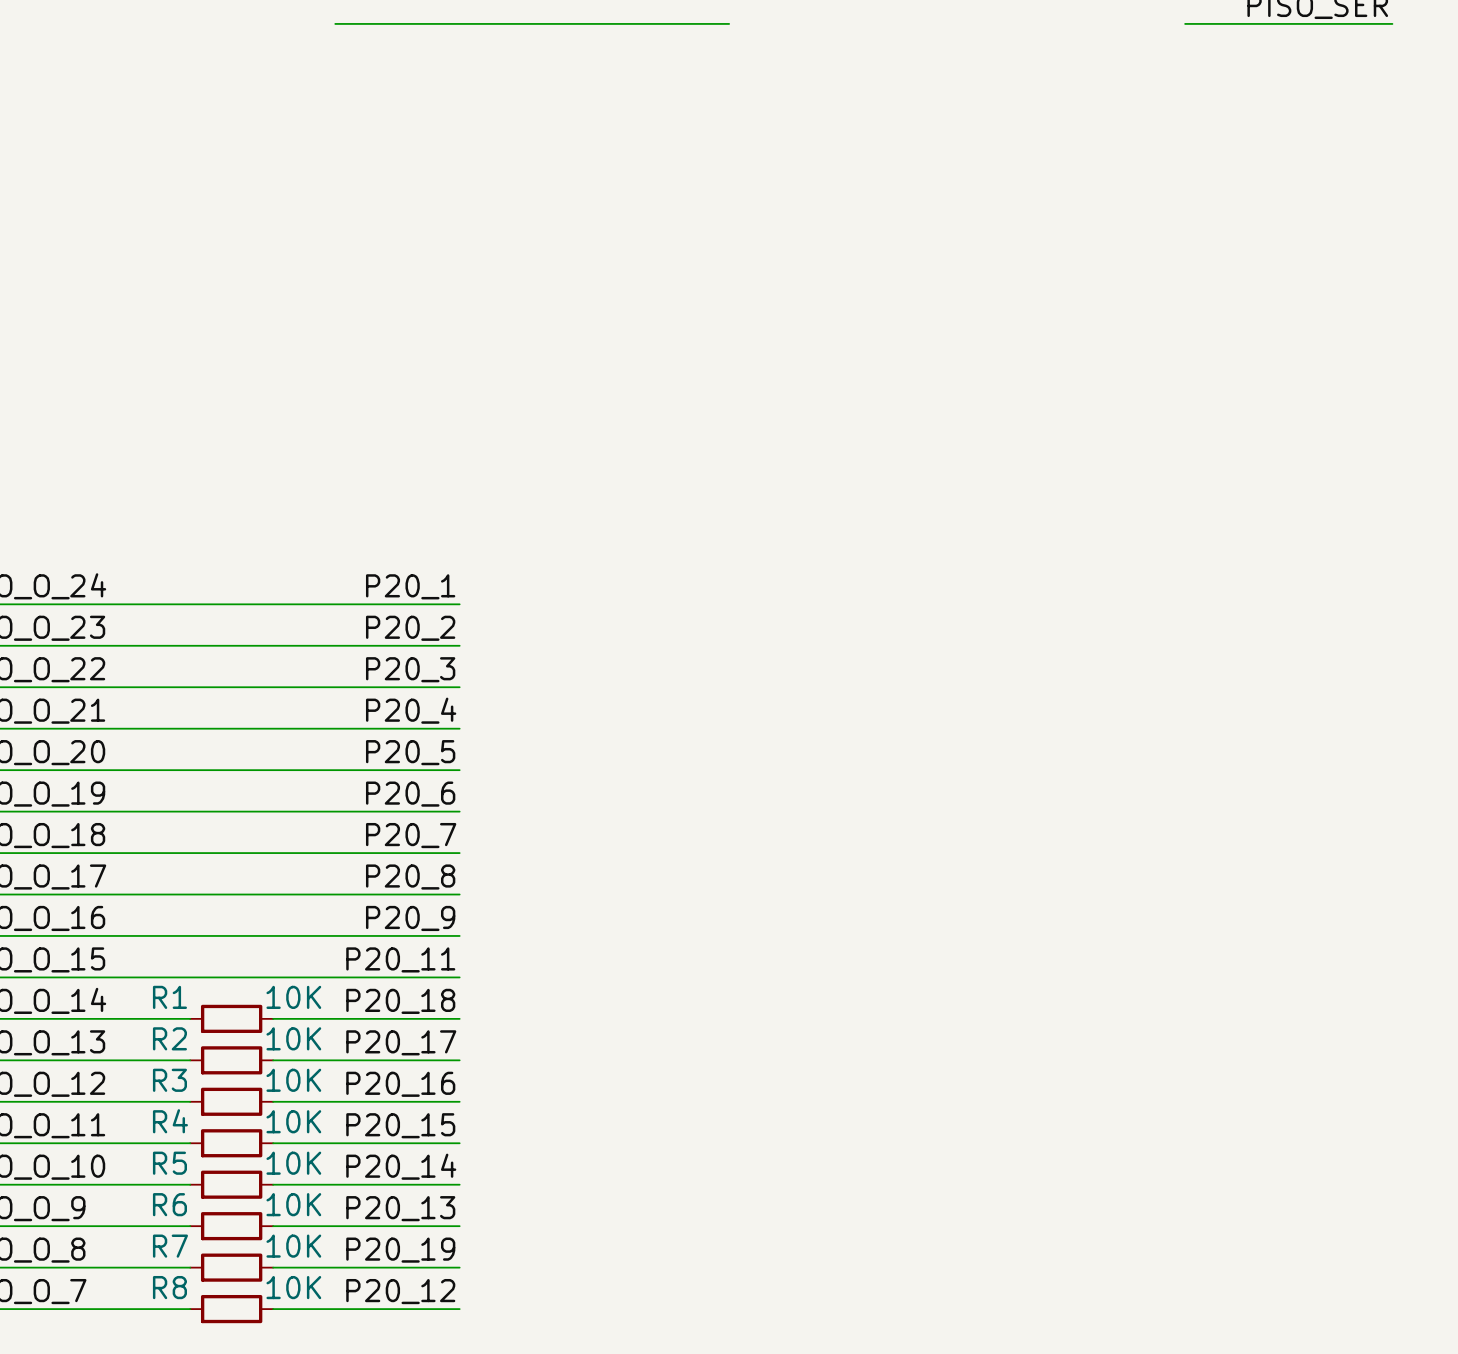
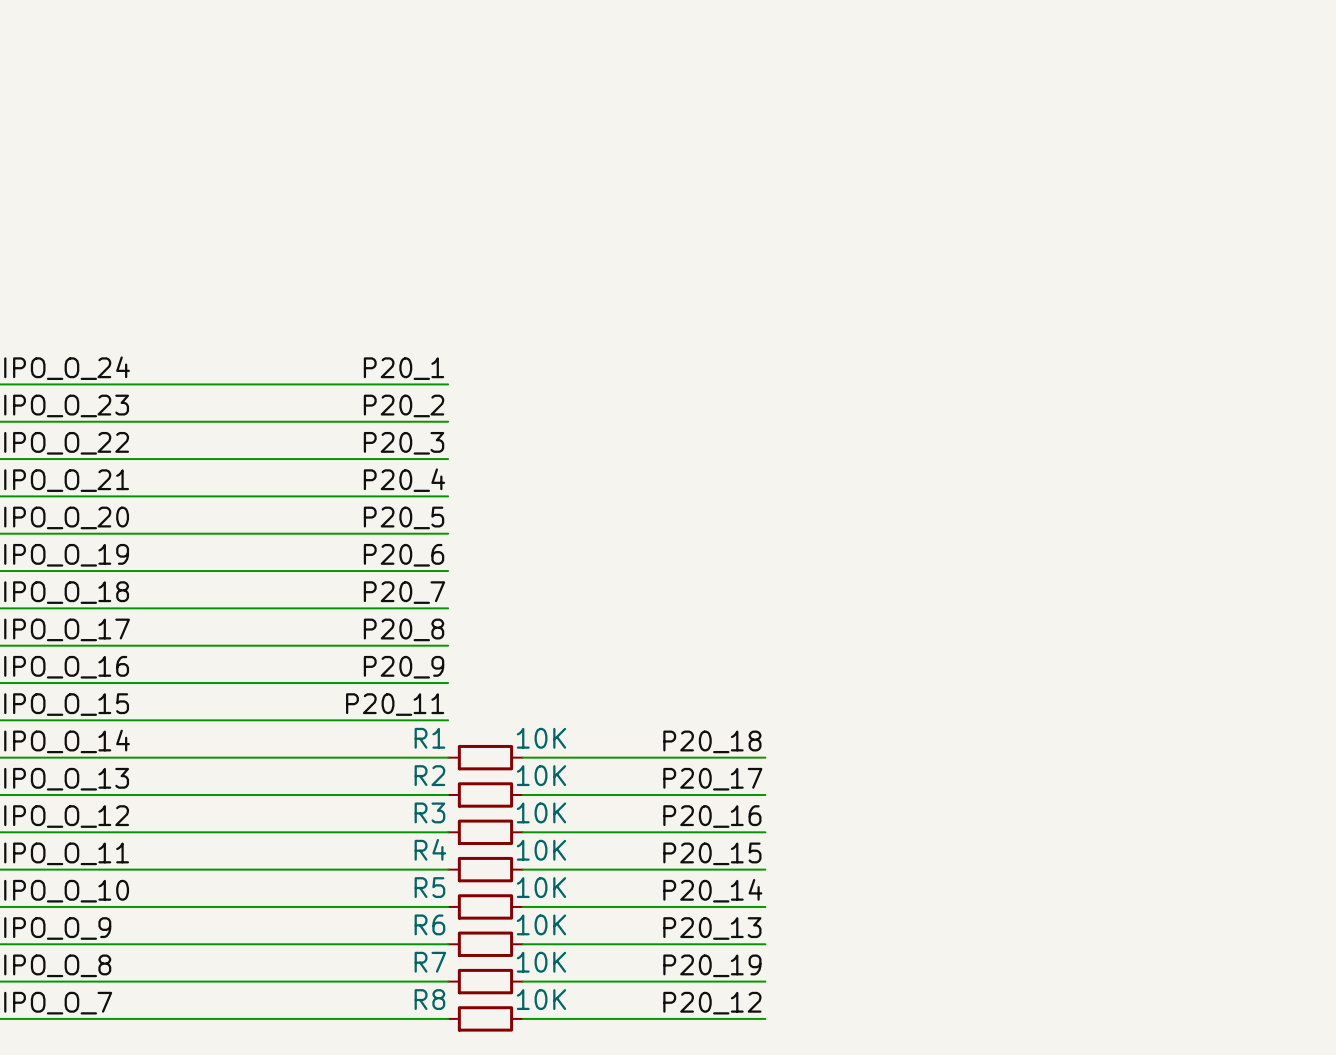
label position: P20_18 (400, 1001) -> P20_18 (712, 741)
wire: none -> (205, 757) (280, 757)
R1 position: (231, 1018) -> (485, 757)
wire: none -> (522, 757) (765, 757)
label position: P20_17 (401, 1042) -> P20_17 (712, 779)
wire: none -> (205, 794) (280, 794)
R2 position: (231, 1060) -> (485, 794)
wire: none -> (522, 794) (765, 794)
label position: P20_16 (400, 1084) -> P20_16 (712, 816)
wire: none -> (205, 832) (280, 832)
R3 position: (231, 1101) -> (485, 832)
wire: none -> (522, 832) (765, 832)
label position: P20_15 (400, 1125) -> P20_15 (712, 853)
wire: none -> (205, 869) (280, 869)
R4 position: (231, 1143) -> (485, 869)
wire: none -> (522, 869) (765, 869)
label position: P20_14 (401, 1166) -> P20_14 (712, 890)
wire: none -> (205, 906) (280, 906)
R5 position: (231, 1184) -> (485, 906)
wire: none -> (522, 906) (765, 906)
label position: P20_13 (400, 1208) -> P20_13 (712, 928)
wire: none -> (205, 944) (280, 944)
R6 position: (231, 1226) -> (485, 944)
wire: none -> (522, 944) (765, 944)
label position: P20_19 (400, 1250) -> P20_19 (712, 965)
wire: none -> (205, 981) (280, 981)
R7 position: (231, 1267) -> (485, 981)
wire: none -> (522, 981) (765, 981)
label position: P20_12 (400, 1291) -> P20_12 (712, 1003)
wire: none -> (205, 1018) (280, 1018)
R8 position: (231, 1309) -> (485, 1018)
wire: none -> (522, 1018) (765, 1018)

